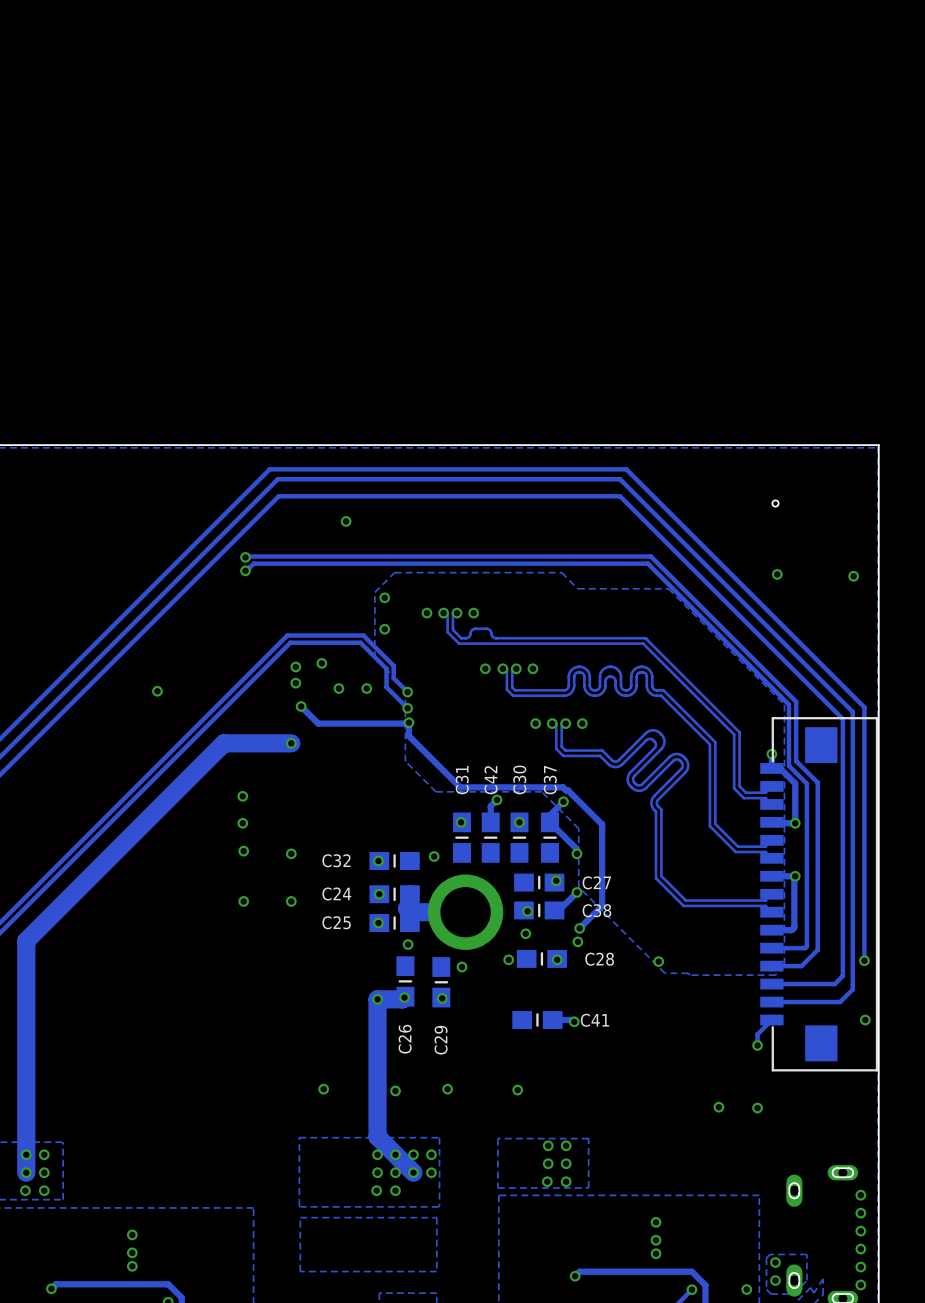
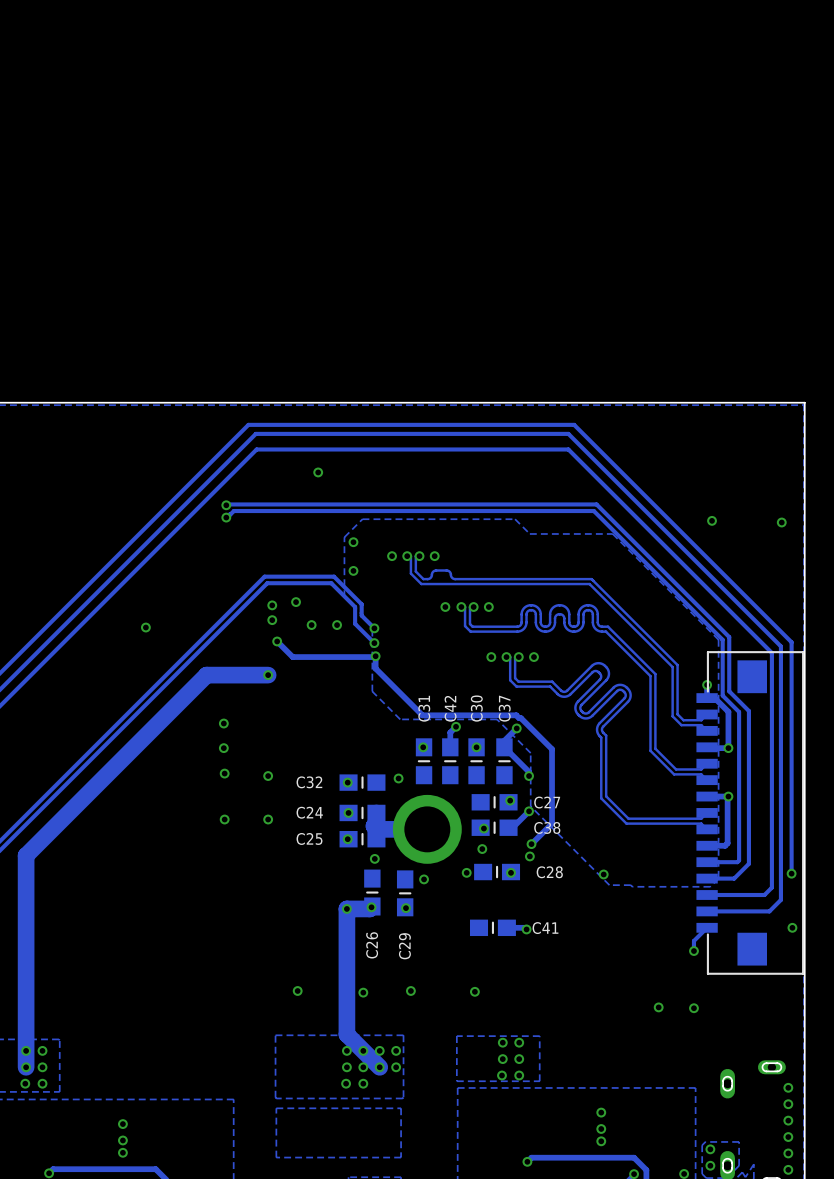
hole: (775, 503) -> none

